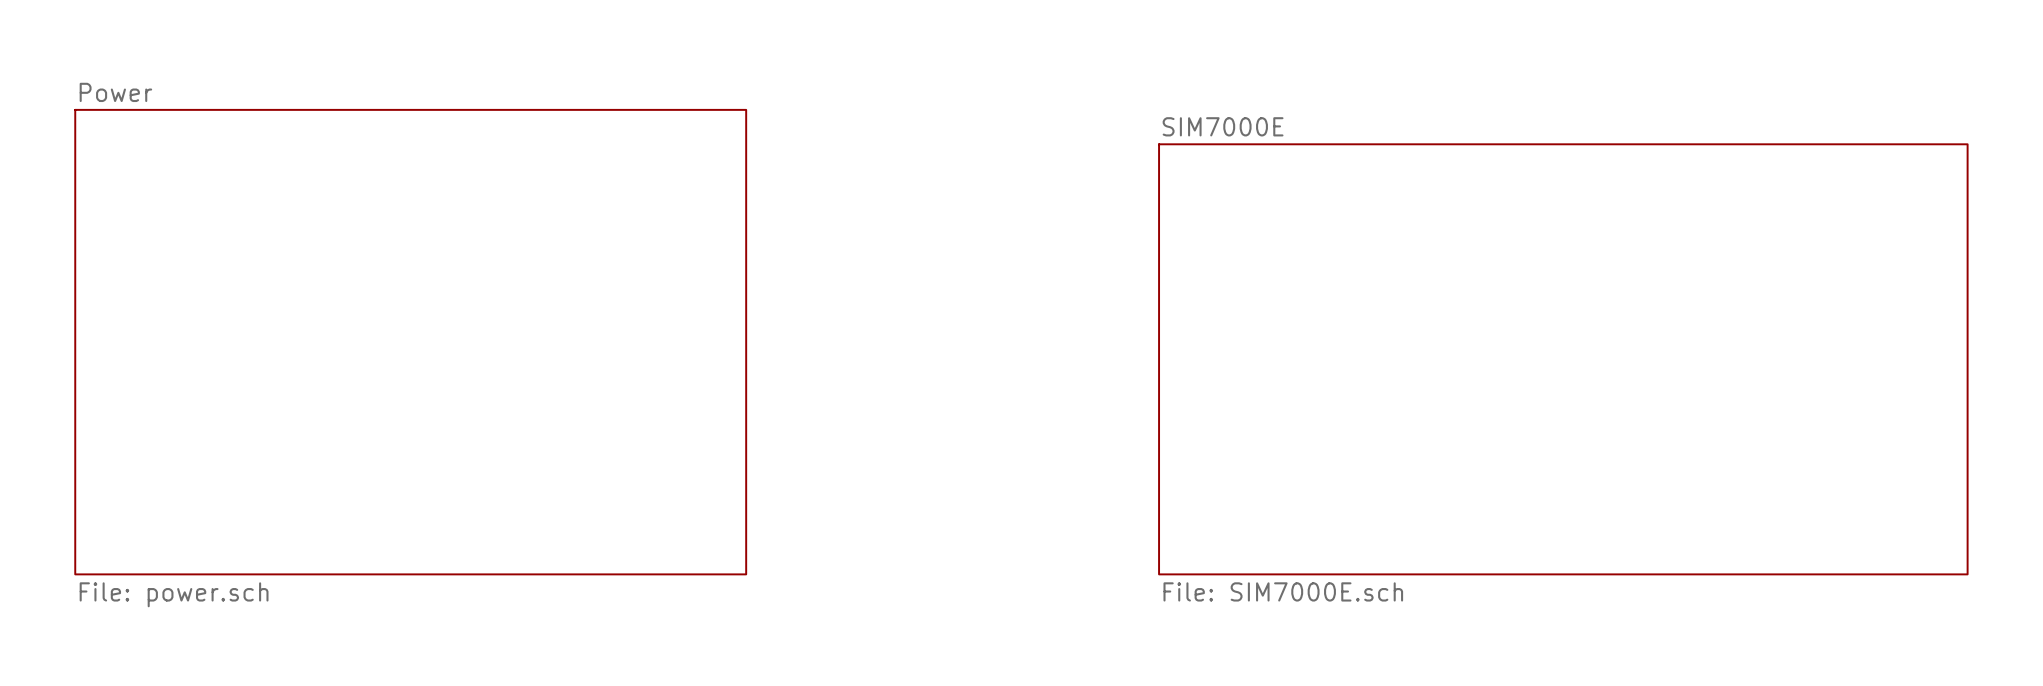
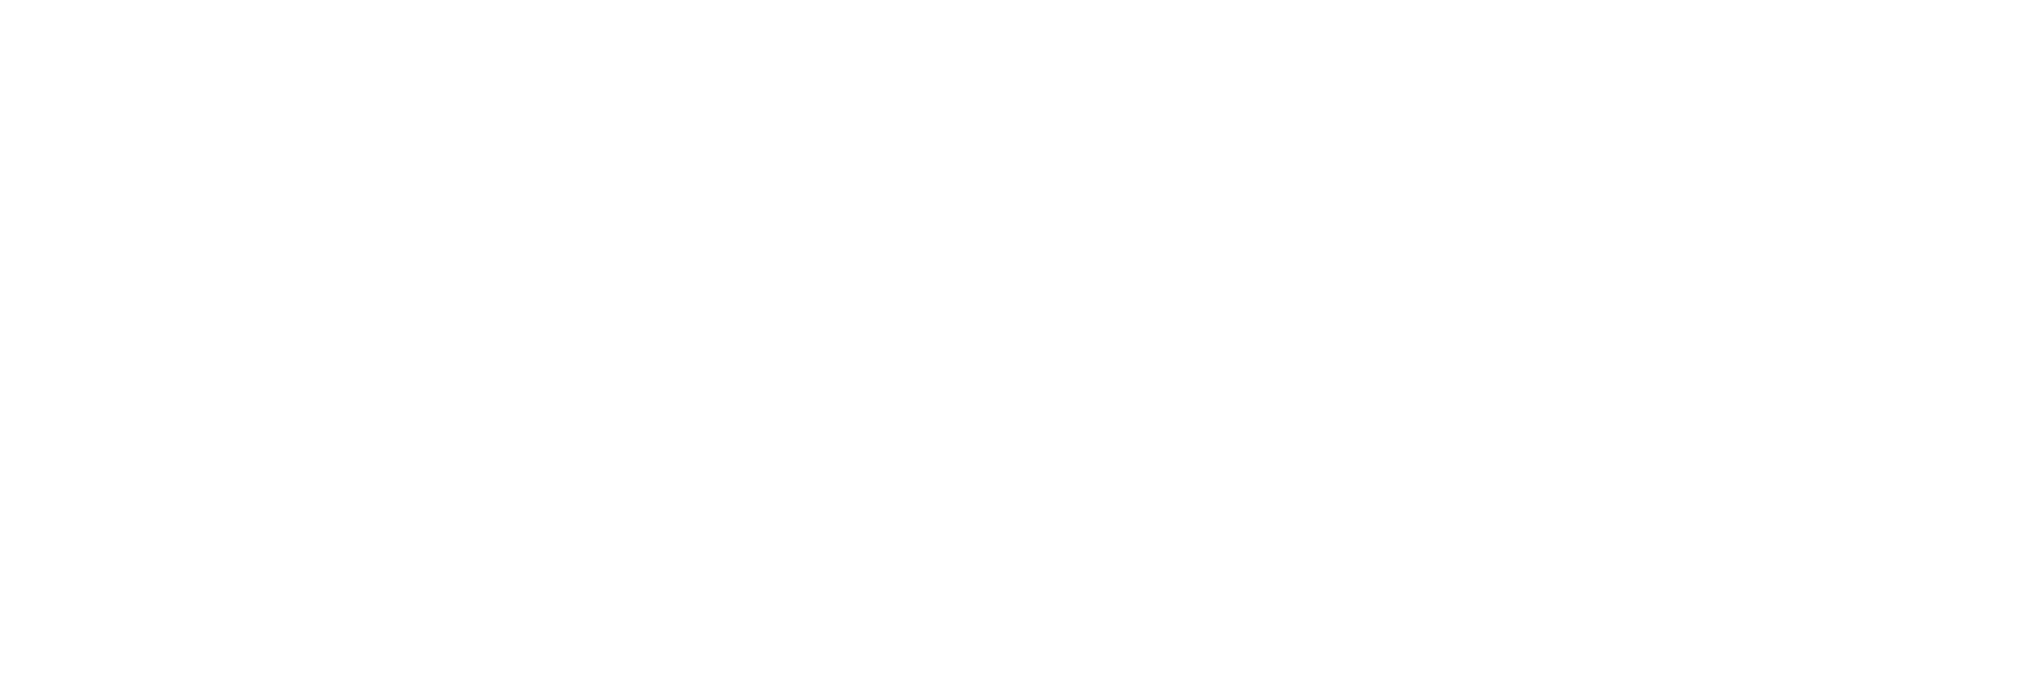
sheet Power: File: power.sch (410, 342) -> none
sheet SIM7000E: File: SIM7000E.sch (1563, 359) -> none

